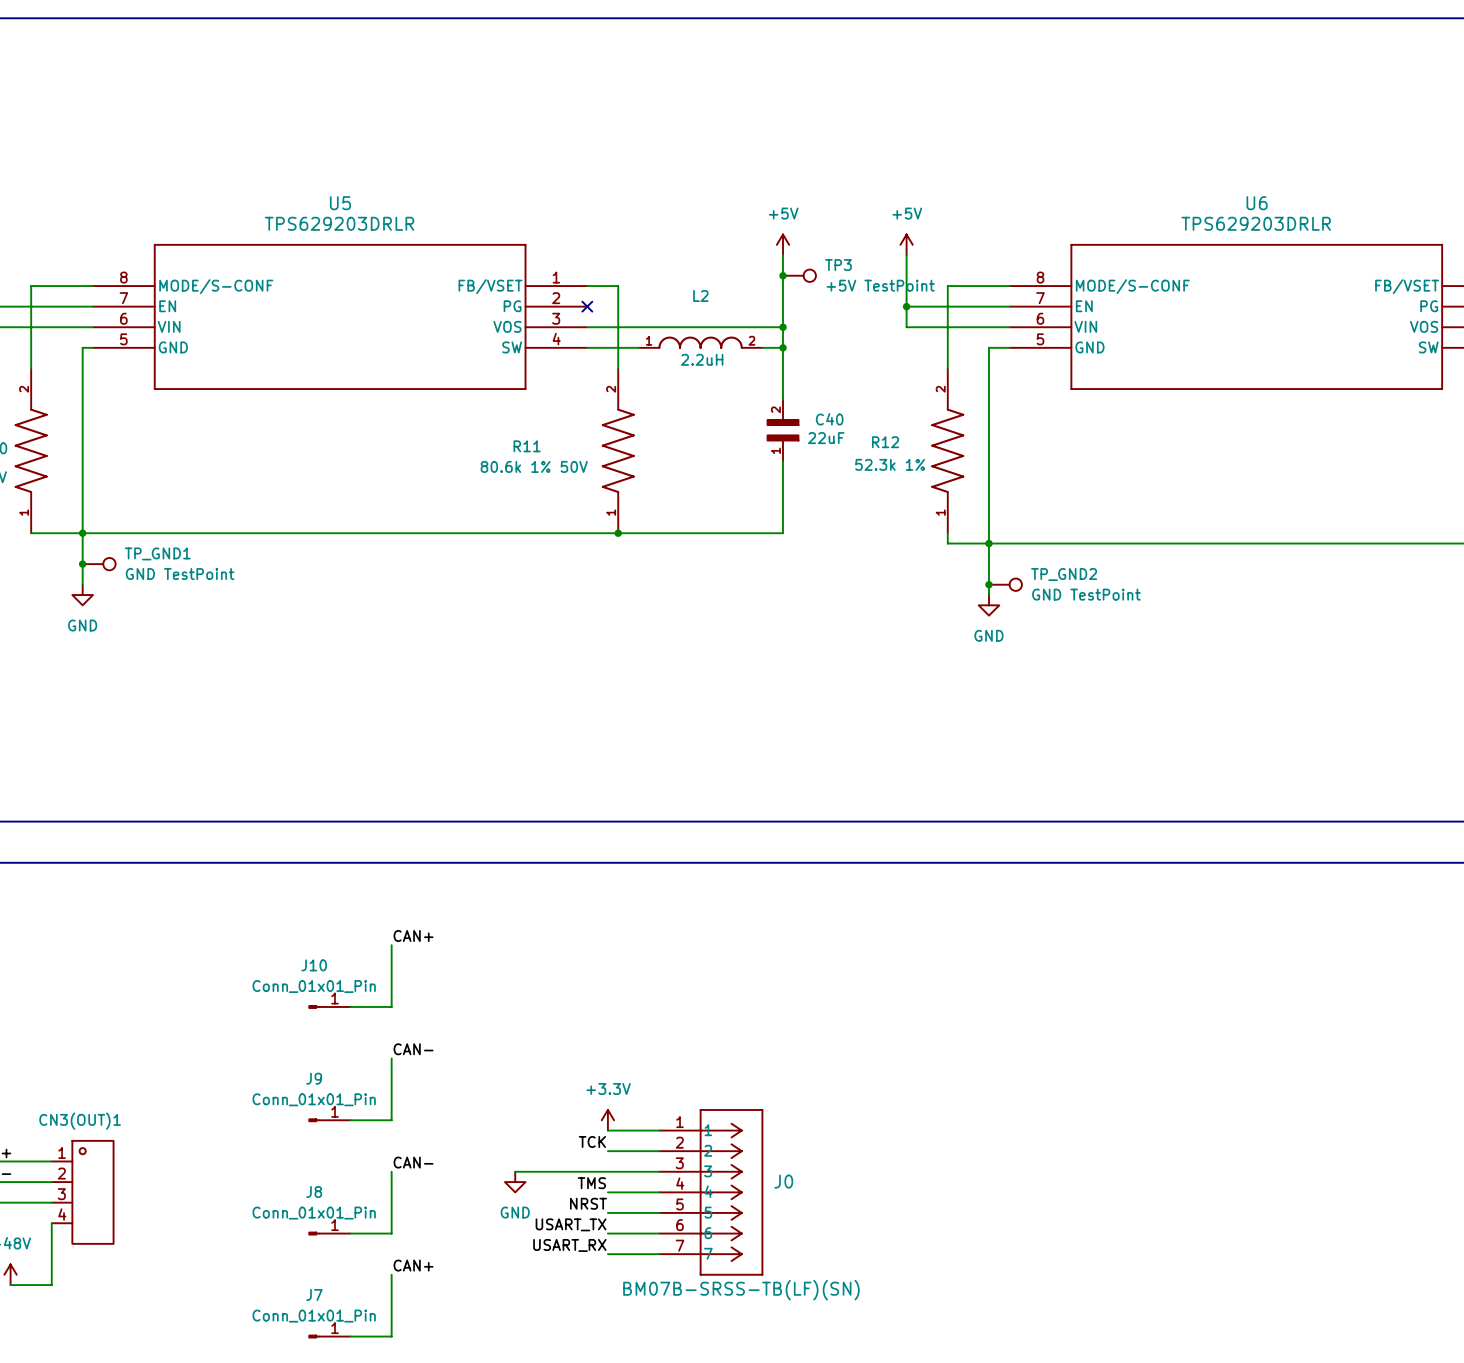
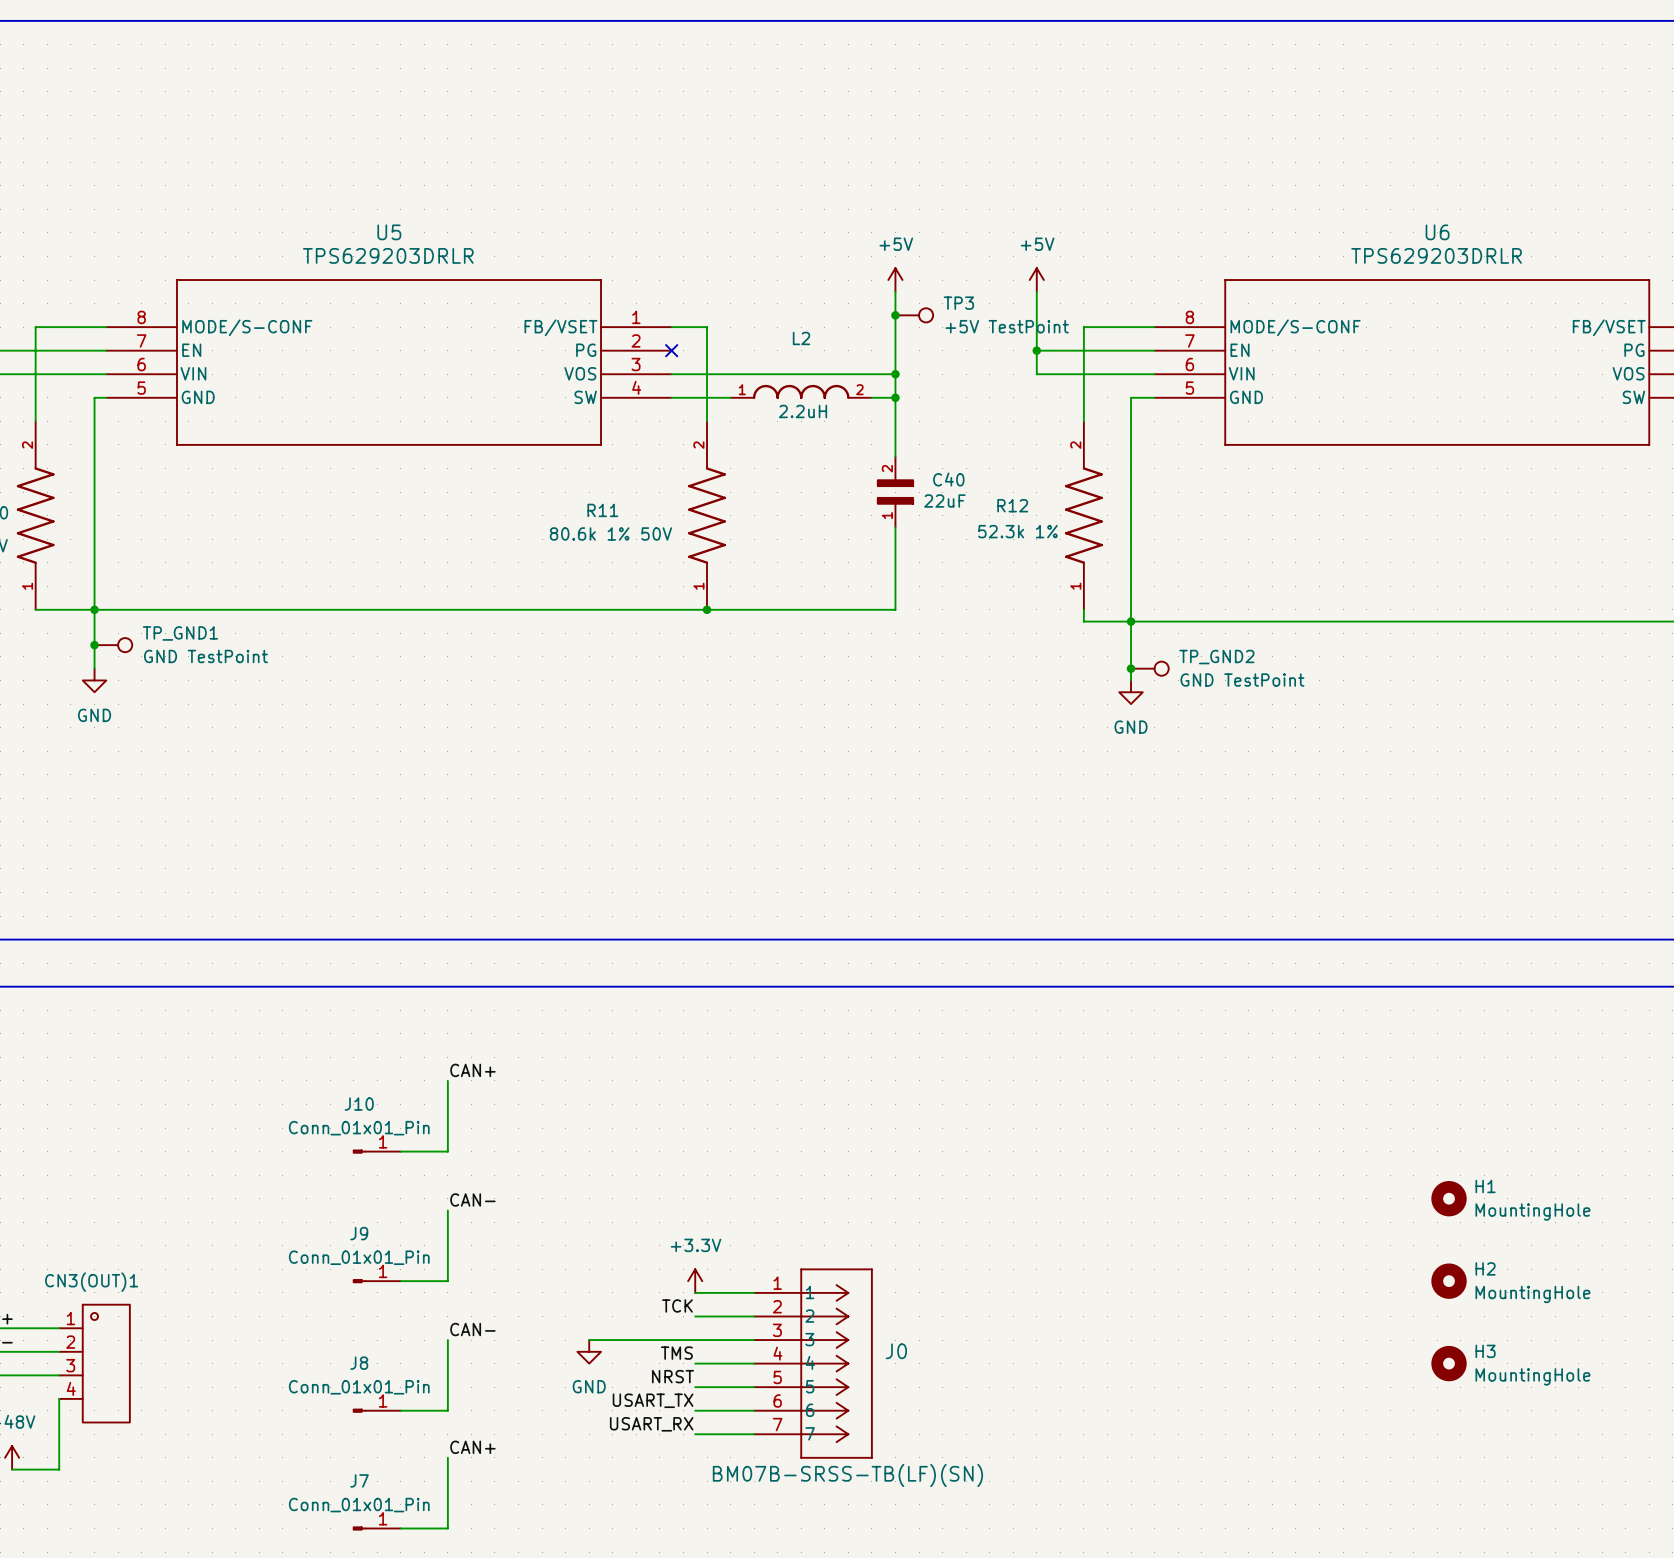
H1: none -> MountingHole (1449, 1198)
H2: none -> MountingHole (1449, 1281)
H3: none -> MountingHole (1449, 1363)

